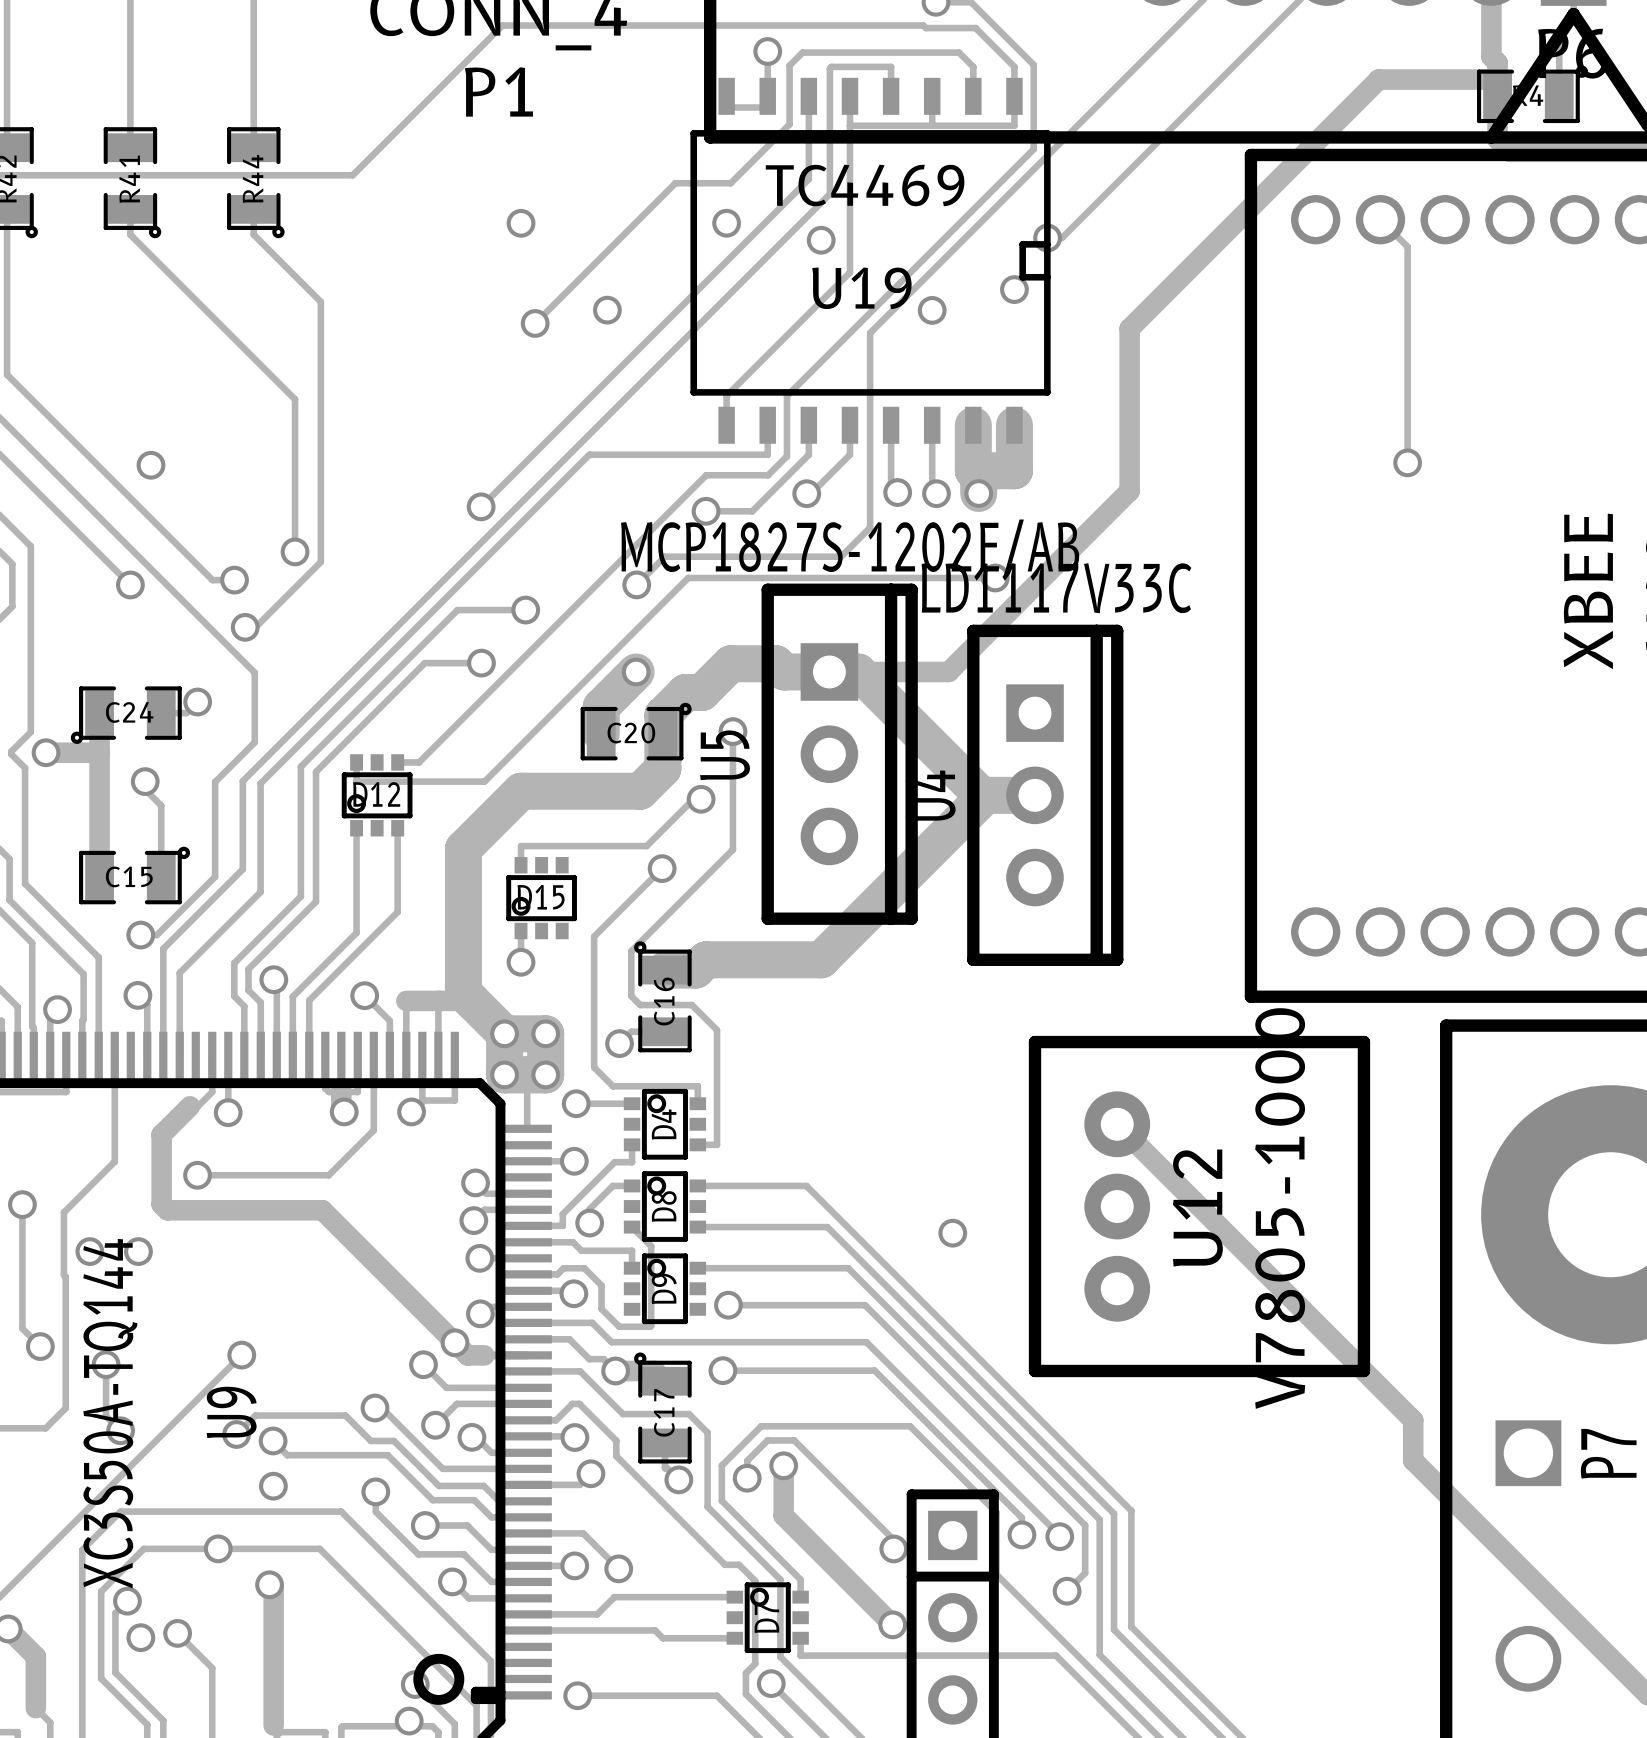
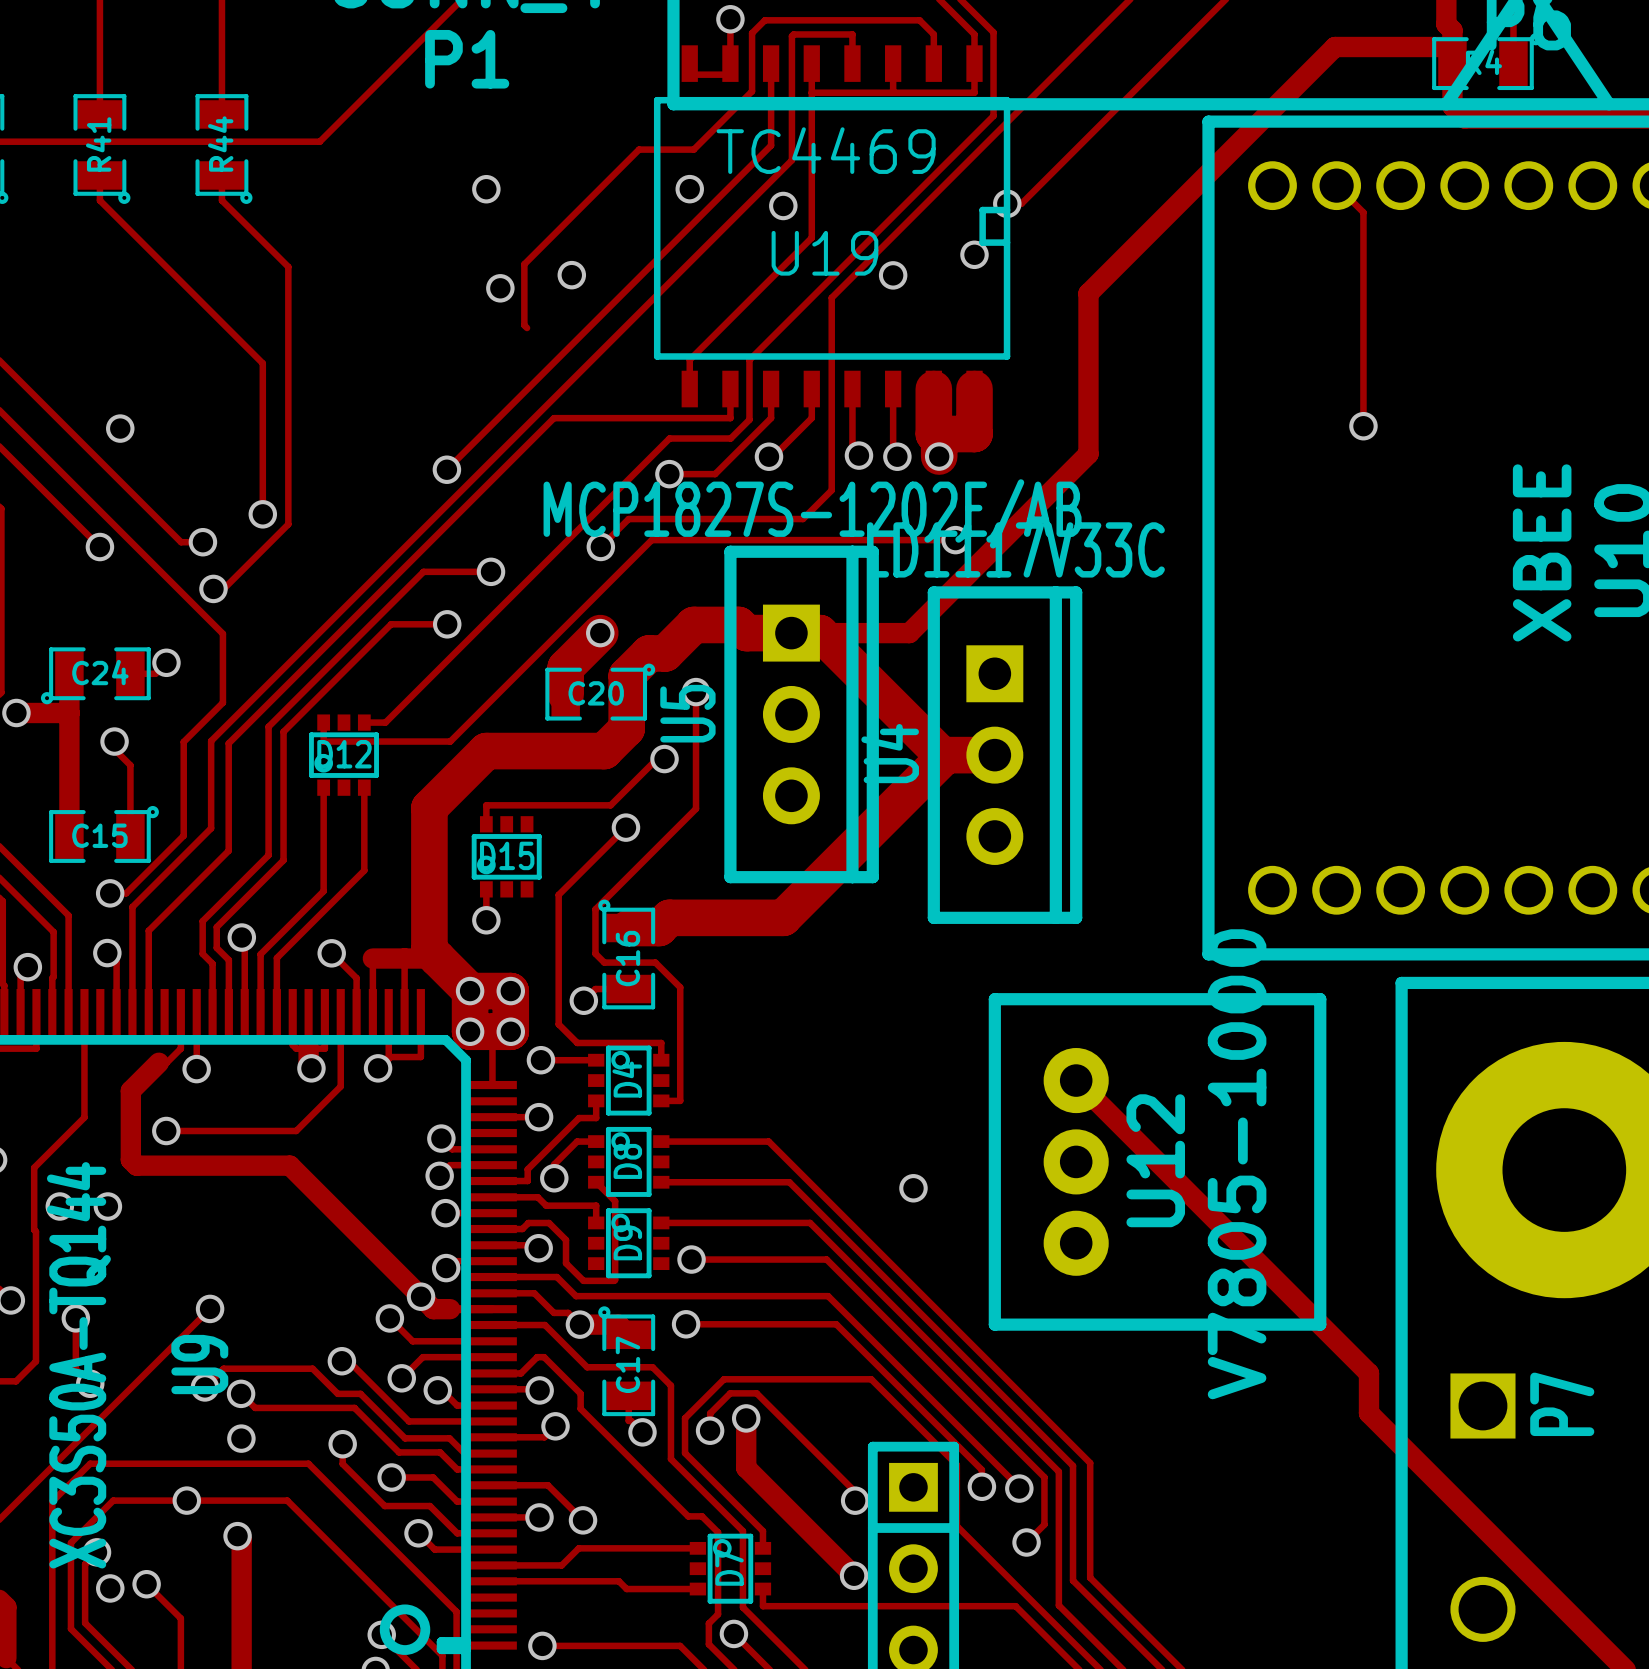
track: (559, 299) (535, 323) -> (524, 264) (524, 325) (527, 328)

